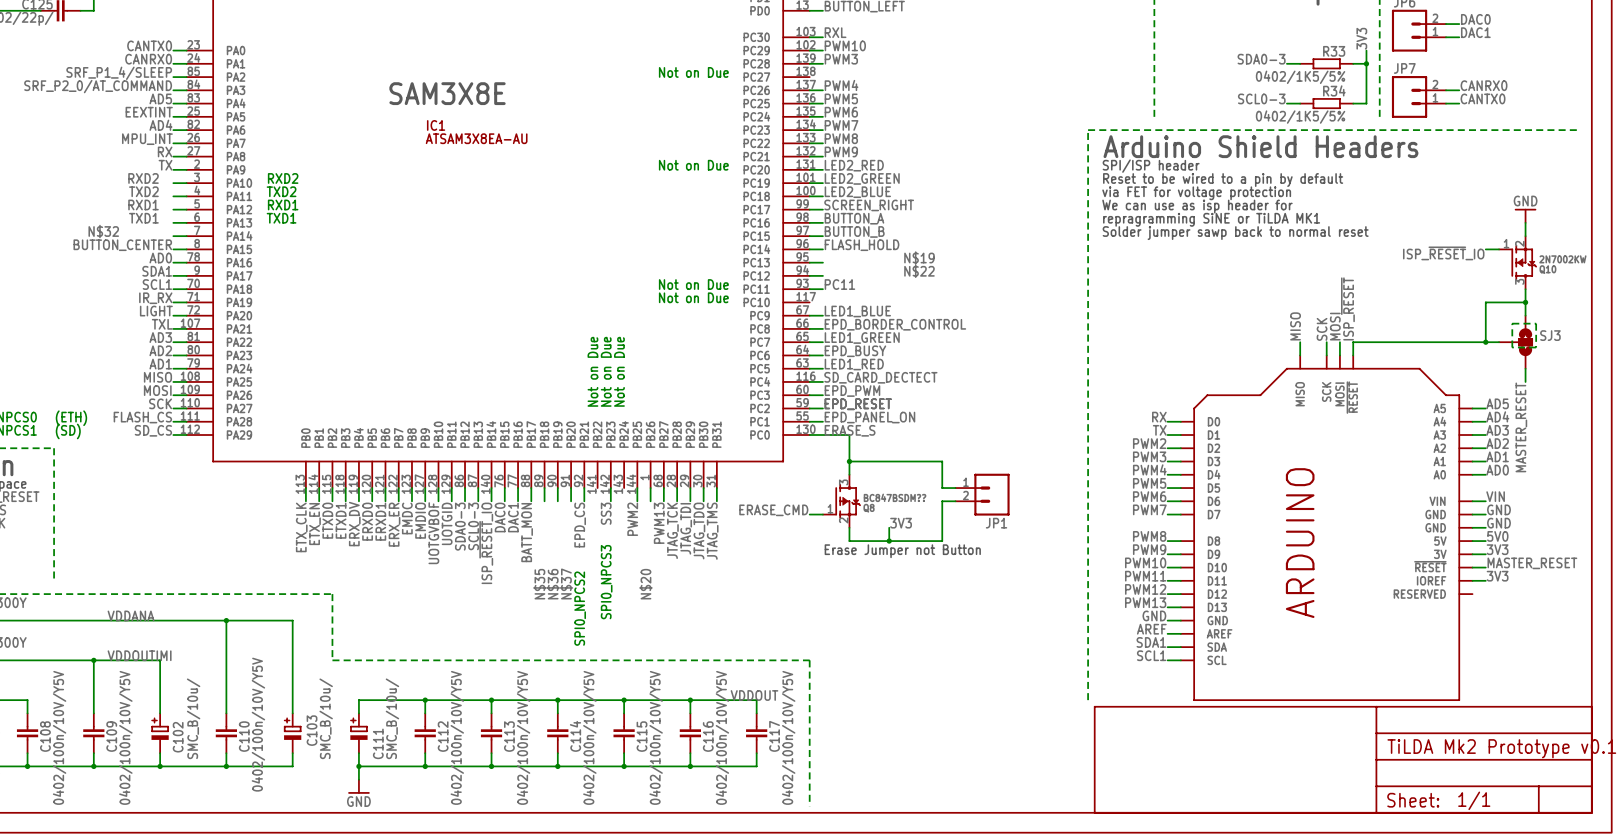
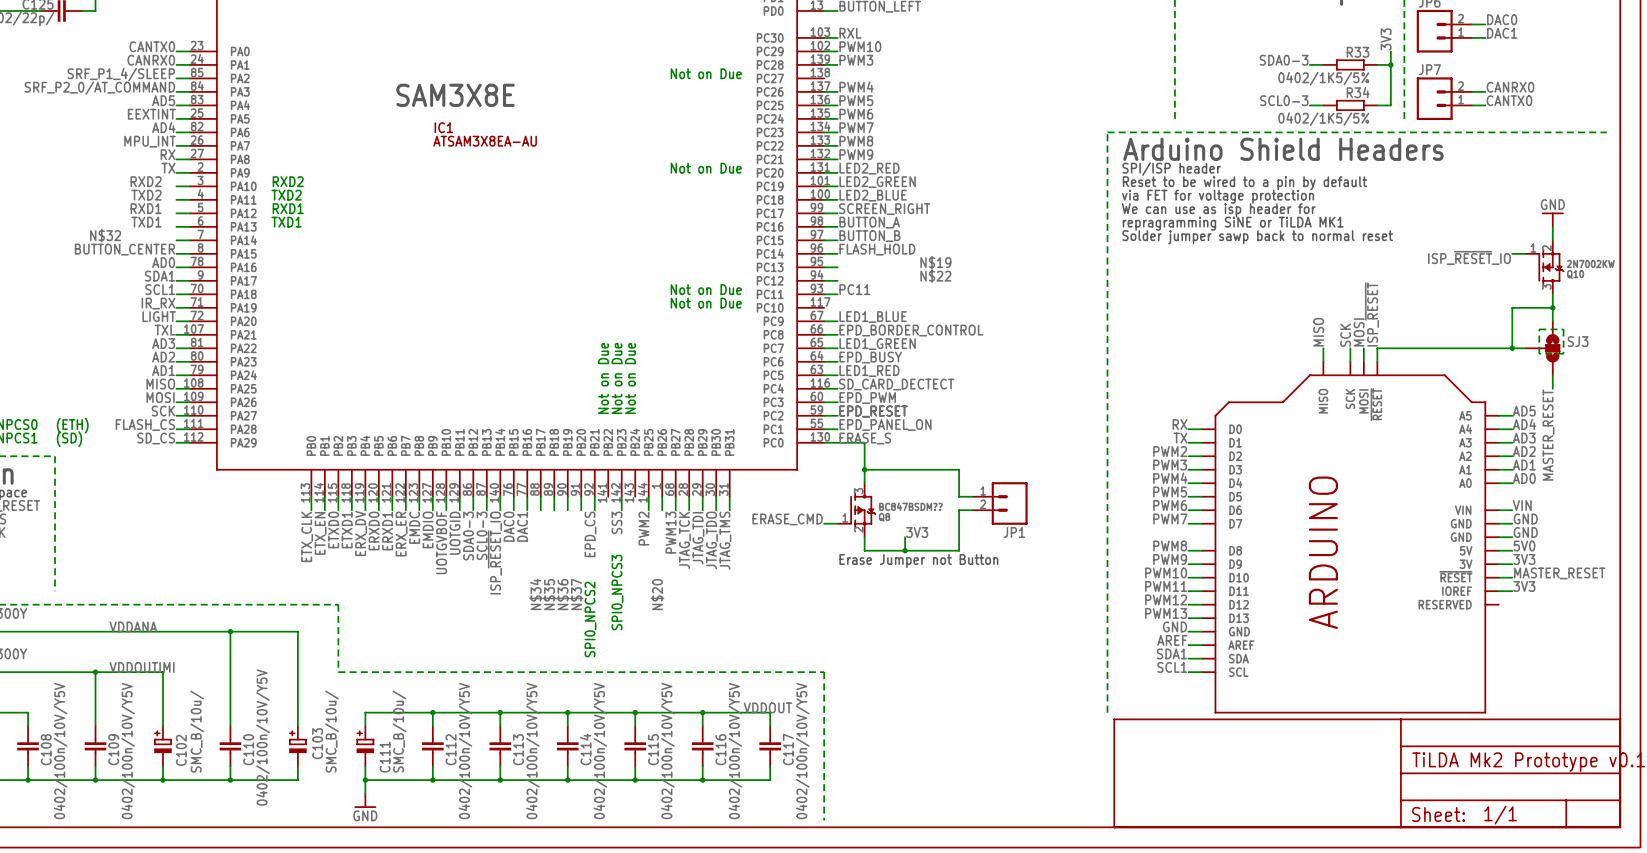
label: BATT_MON (527, 532) -> none
label: none -> N$34 (536, 594)

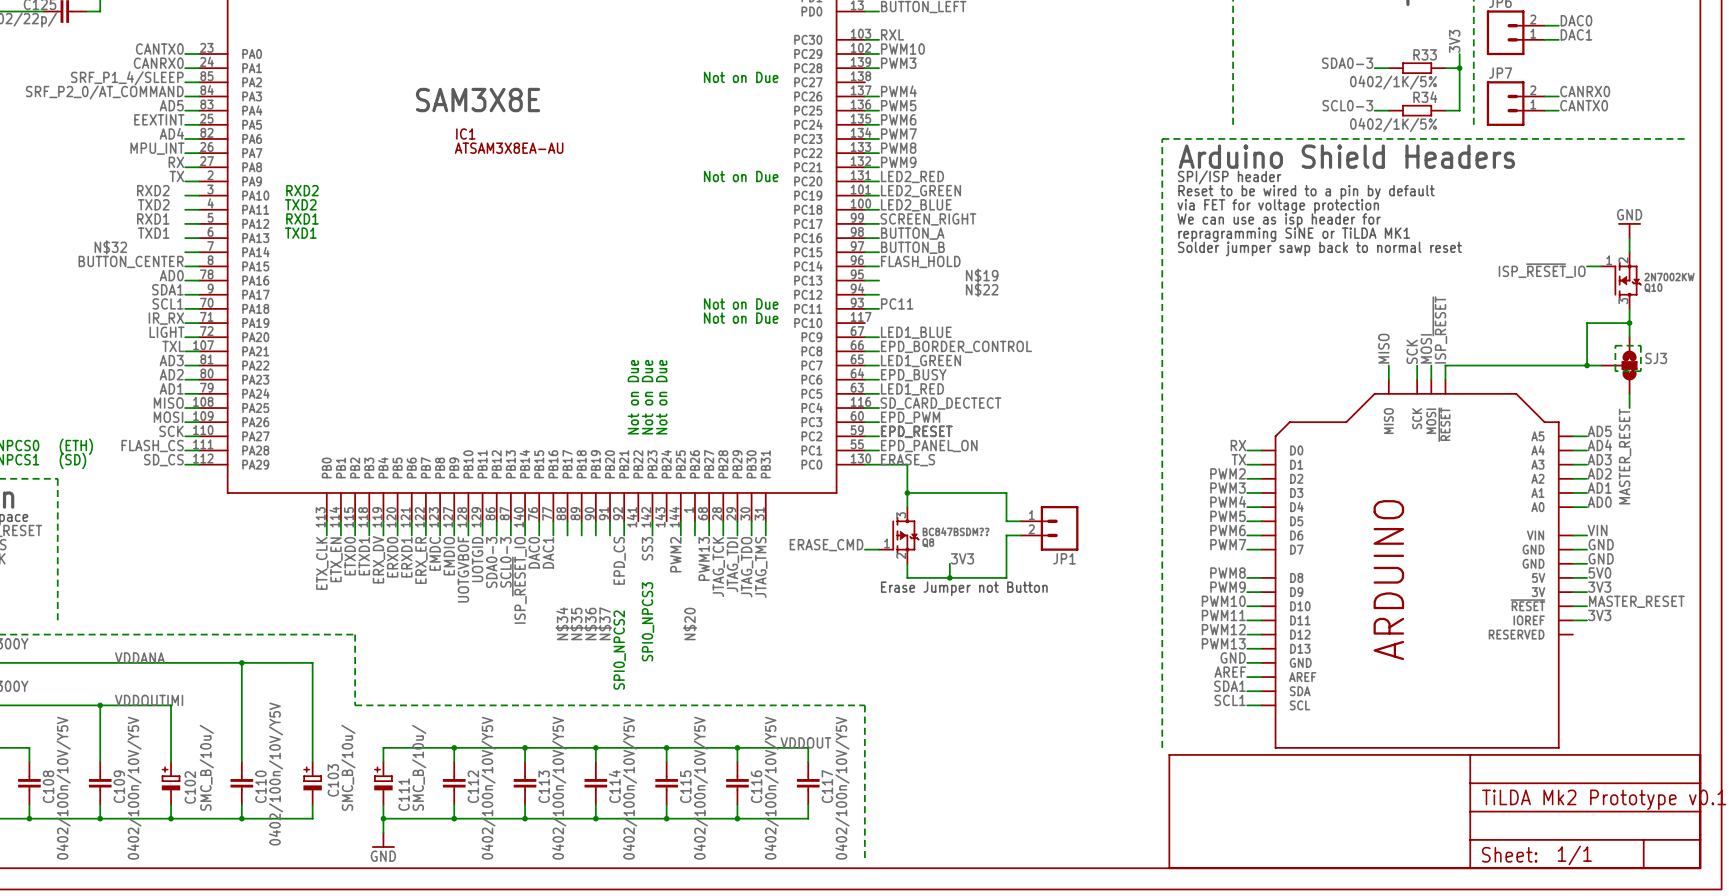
R33 value: 0402/1K5/5% (1323, 78) -> 0402/1K/5% (1393, 82)
R34 value: 0402/1K5/5% (1323, 119) -> 0402/1K/5% (1393, 125)

